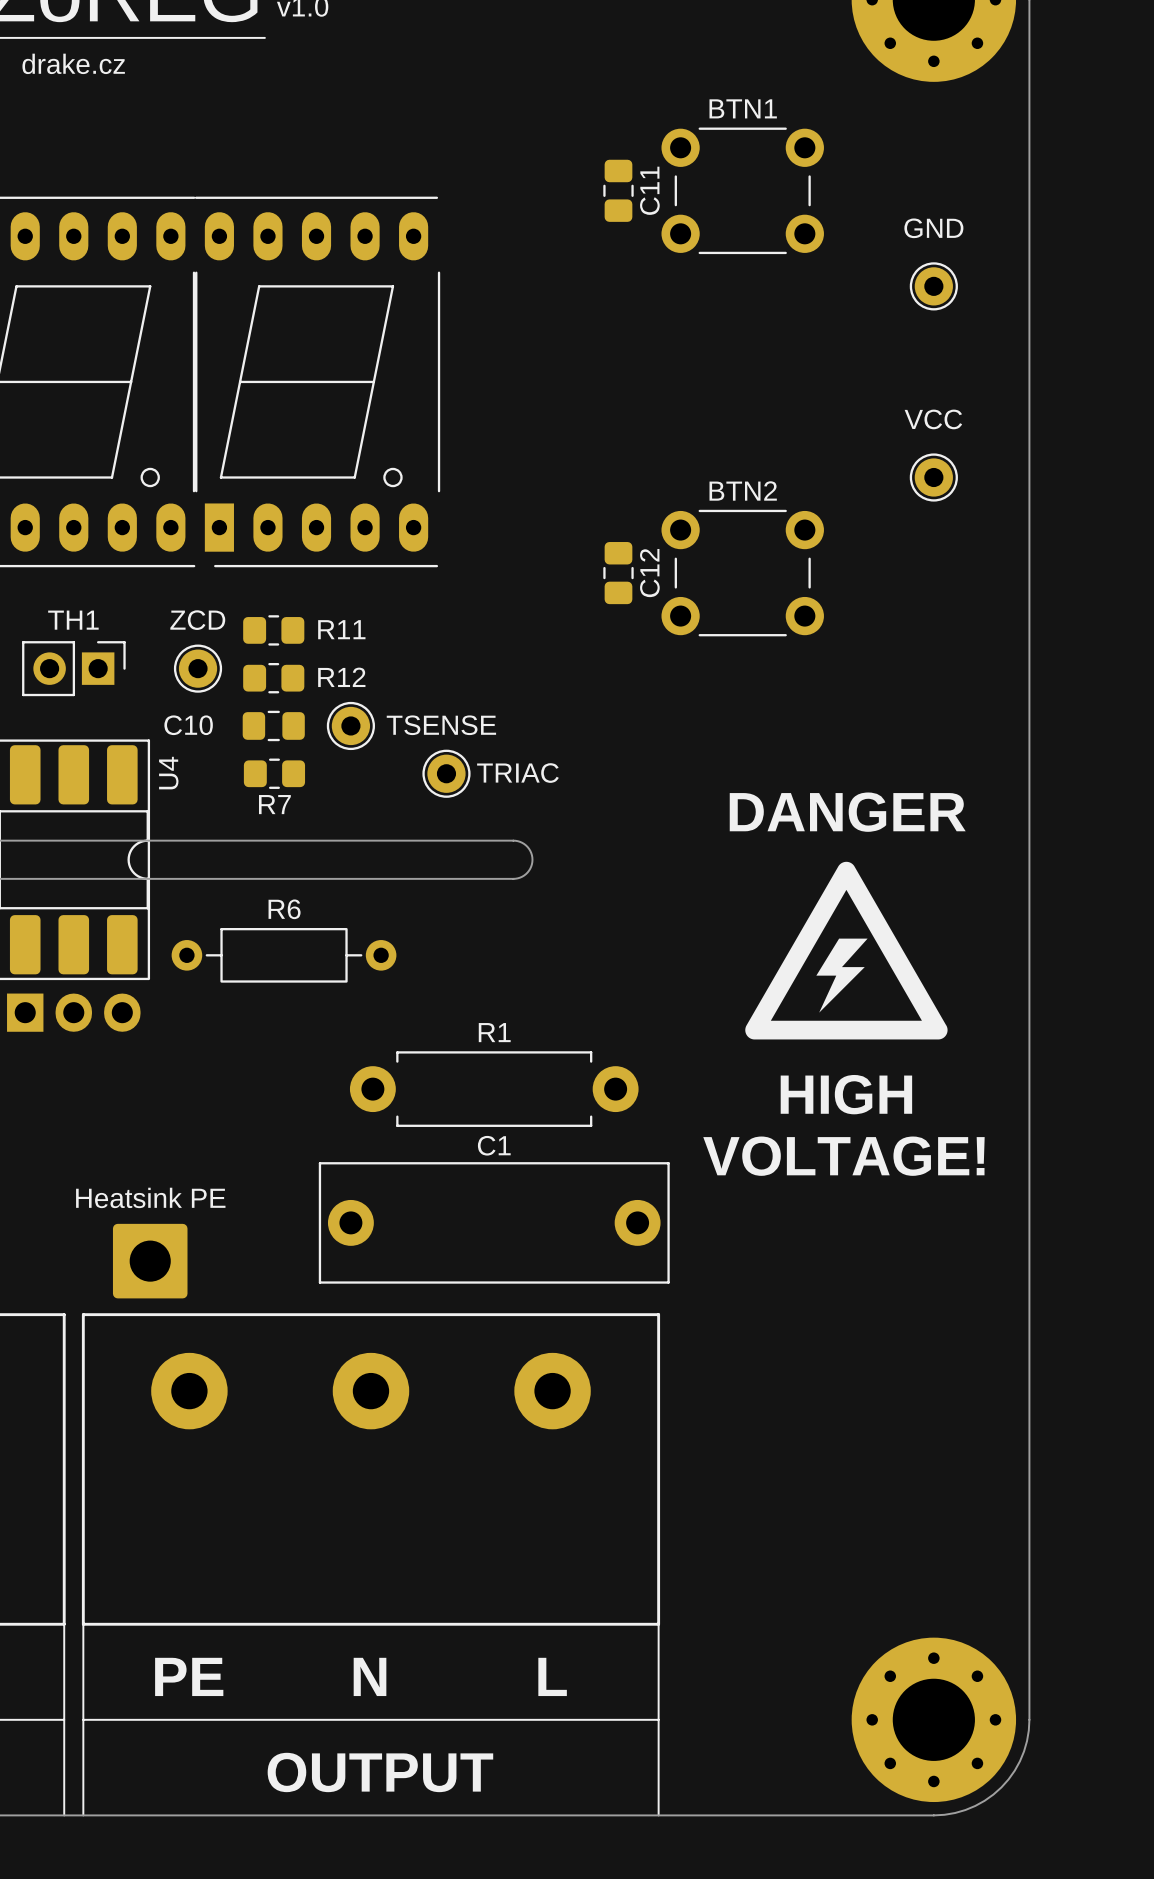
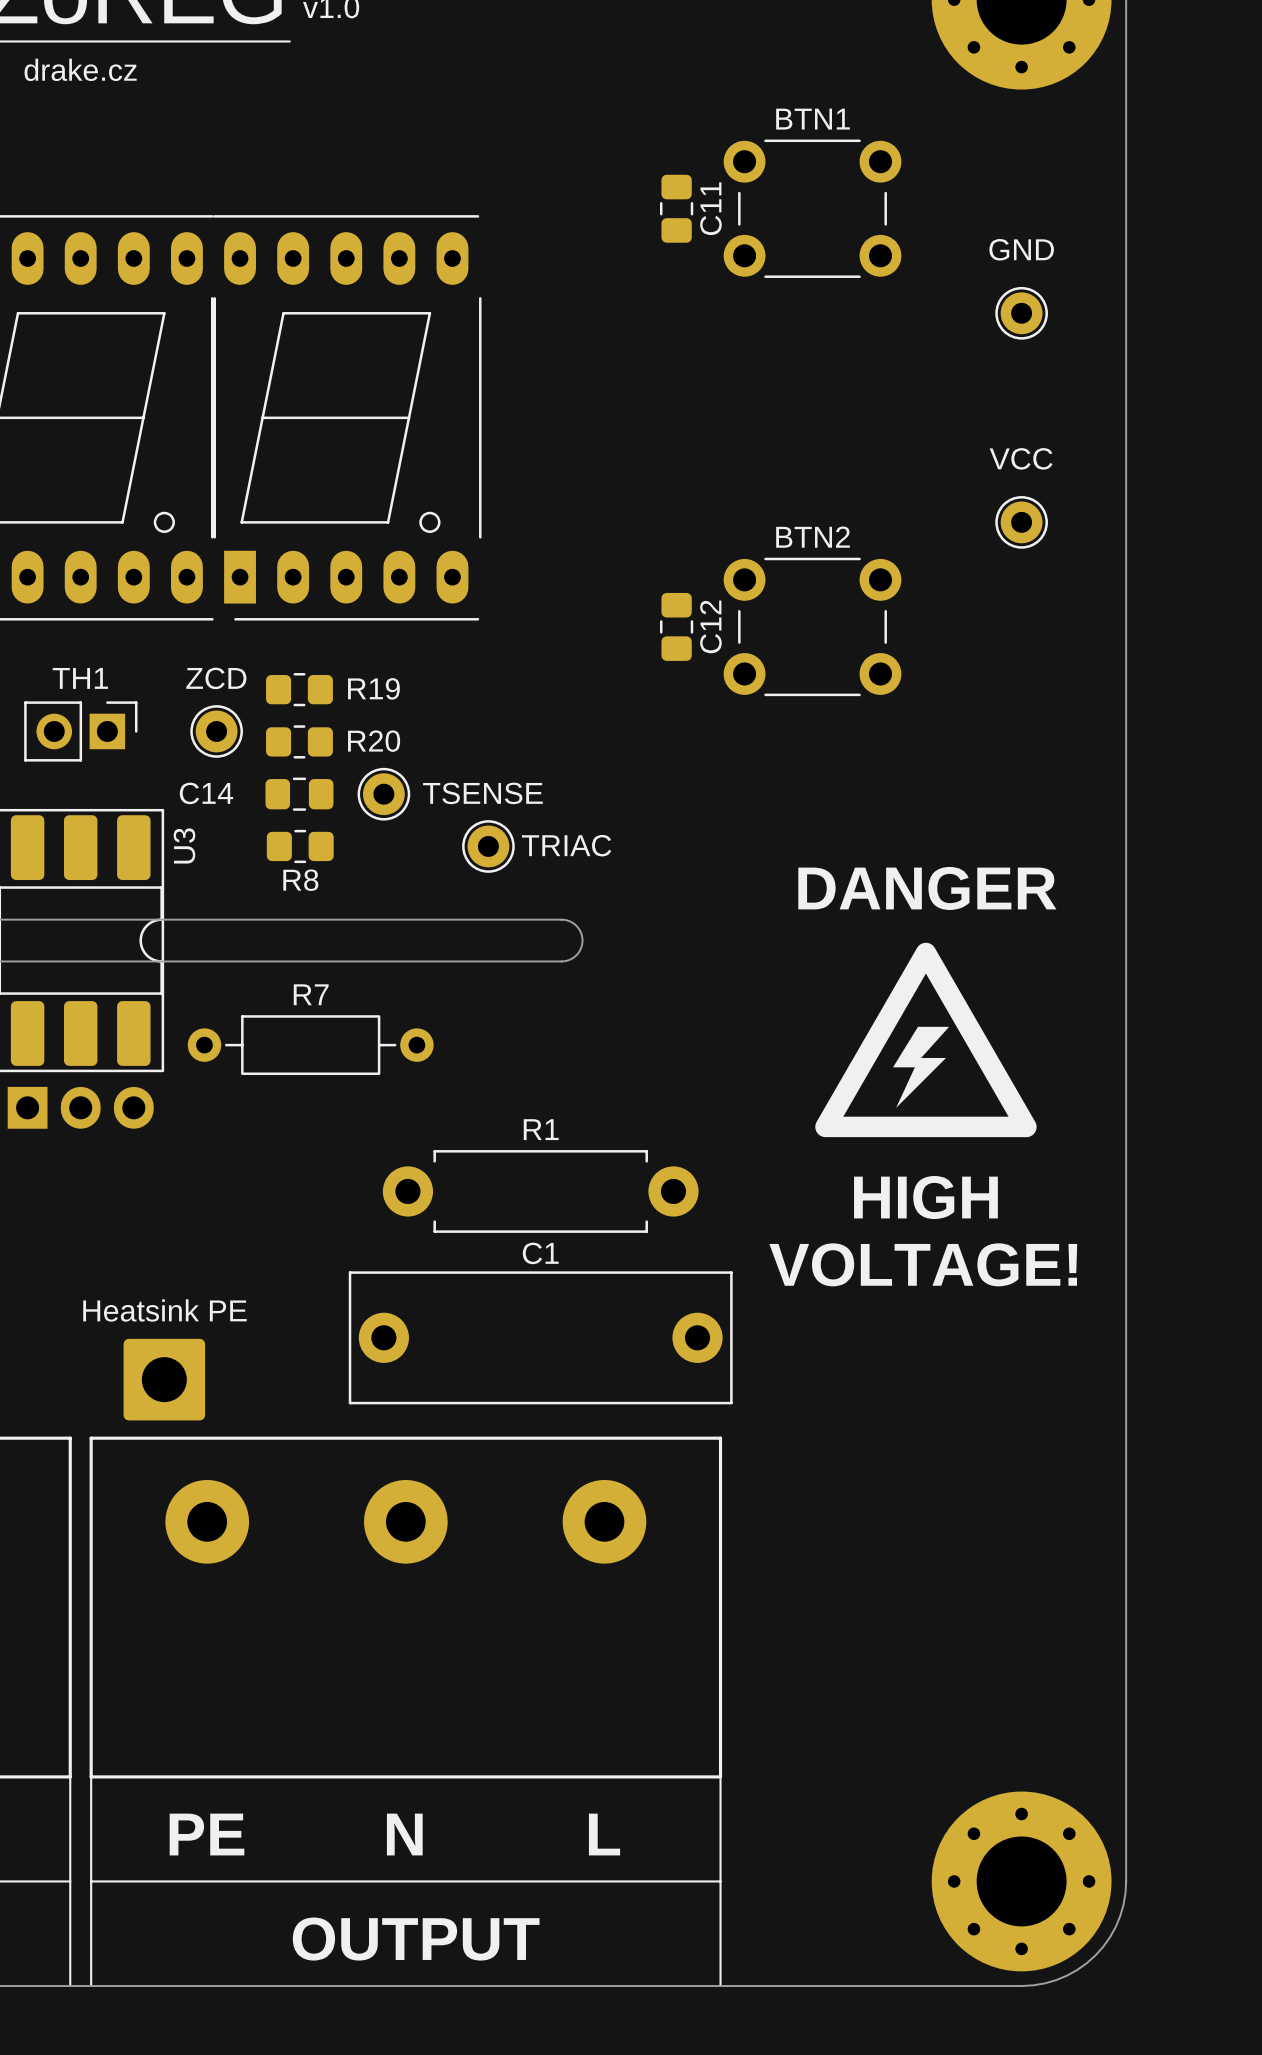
R11 name: R11 (341, 629) -> R19 (373, 688)
R12 name: R12 (341, 677) -> R20 (374, 741)
C10 name: C10 (188, 725) -> C14 (206, 793)
U4 name: U4 (168, 773) -> U3 (184, 845)
R7 name: R7 (274, 804) -> R8 (300, 880)
R6 name: R6 (284, 909) -> R7 (311, 994)

